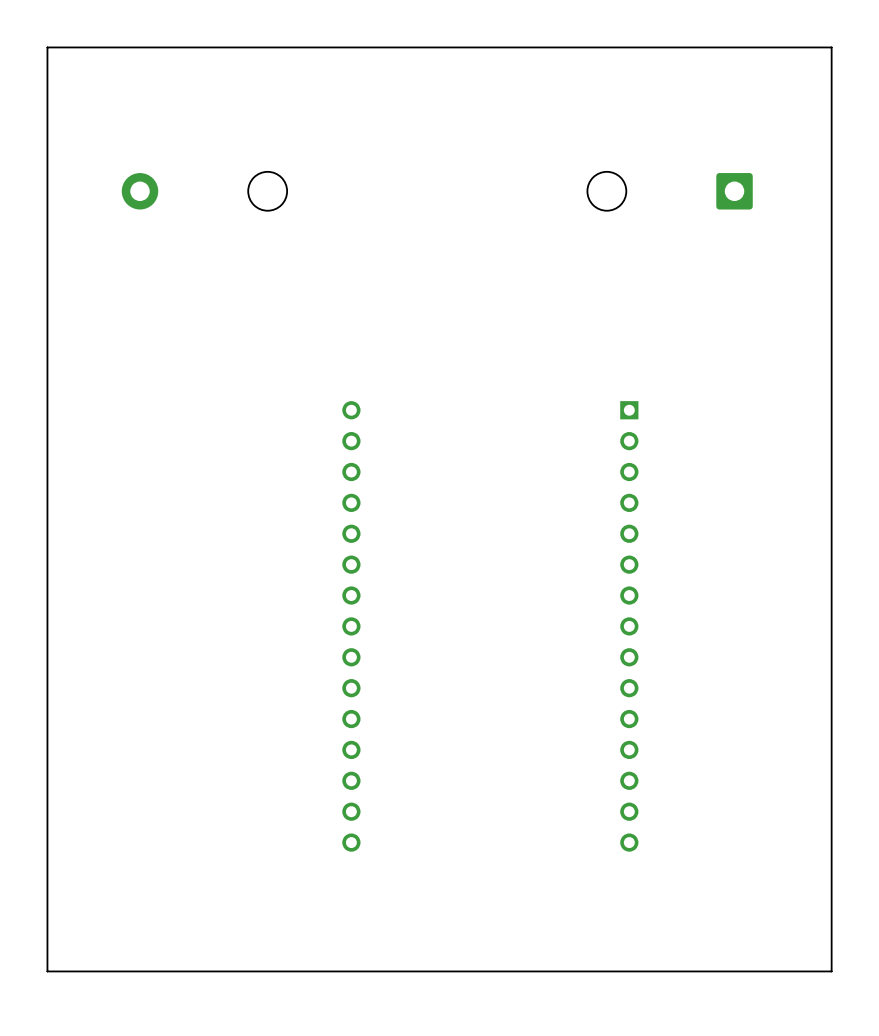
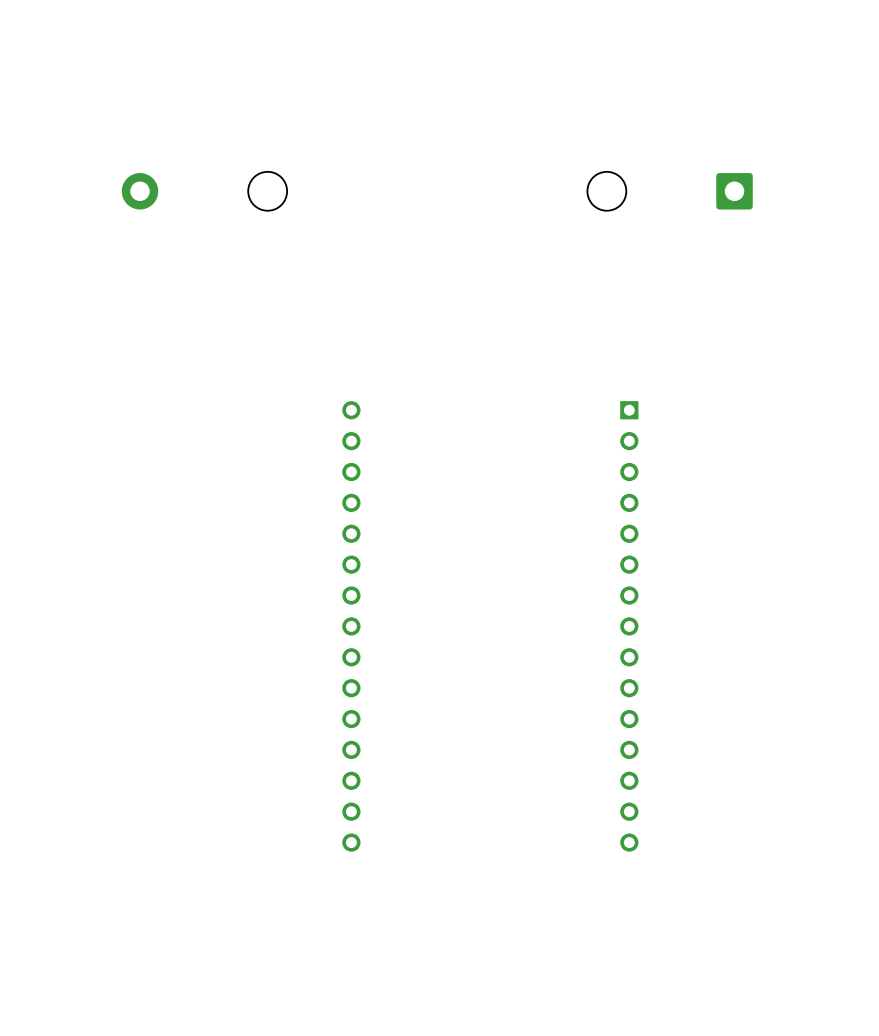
board edge: (831, 47) (47, 47) (47, 971) (831, 971) (831, 47) -> none

